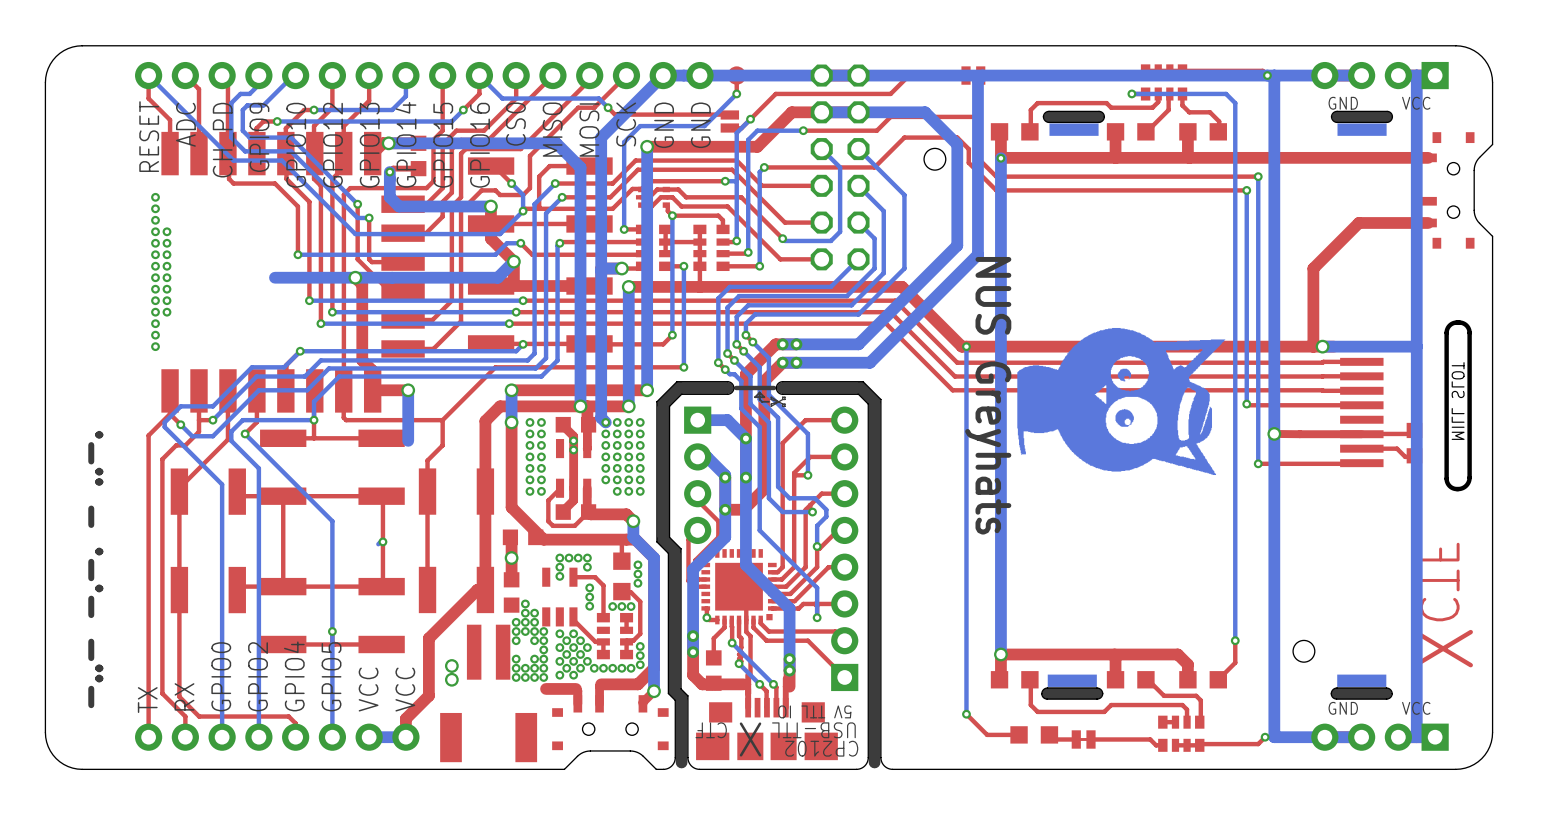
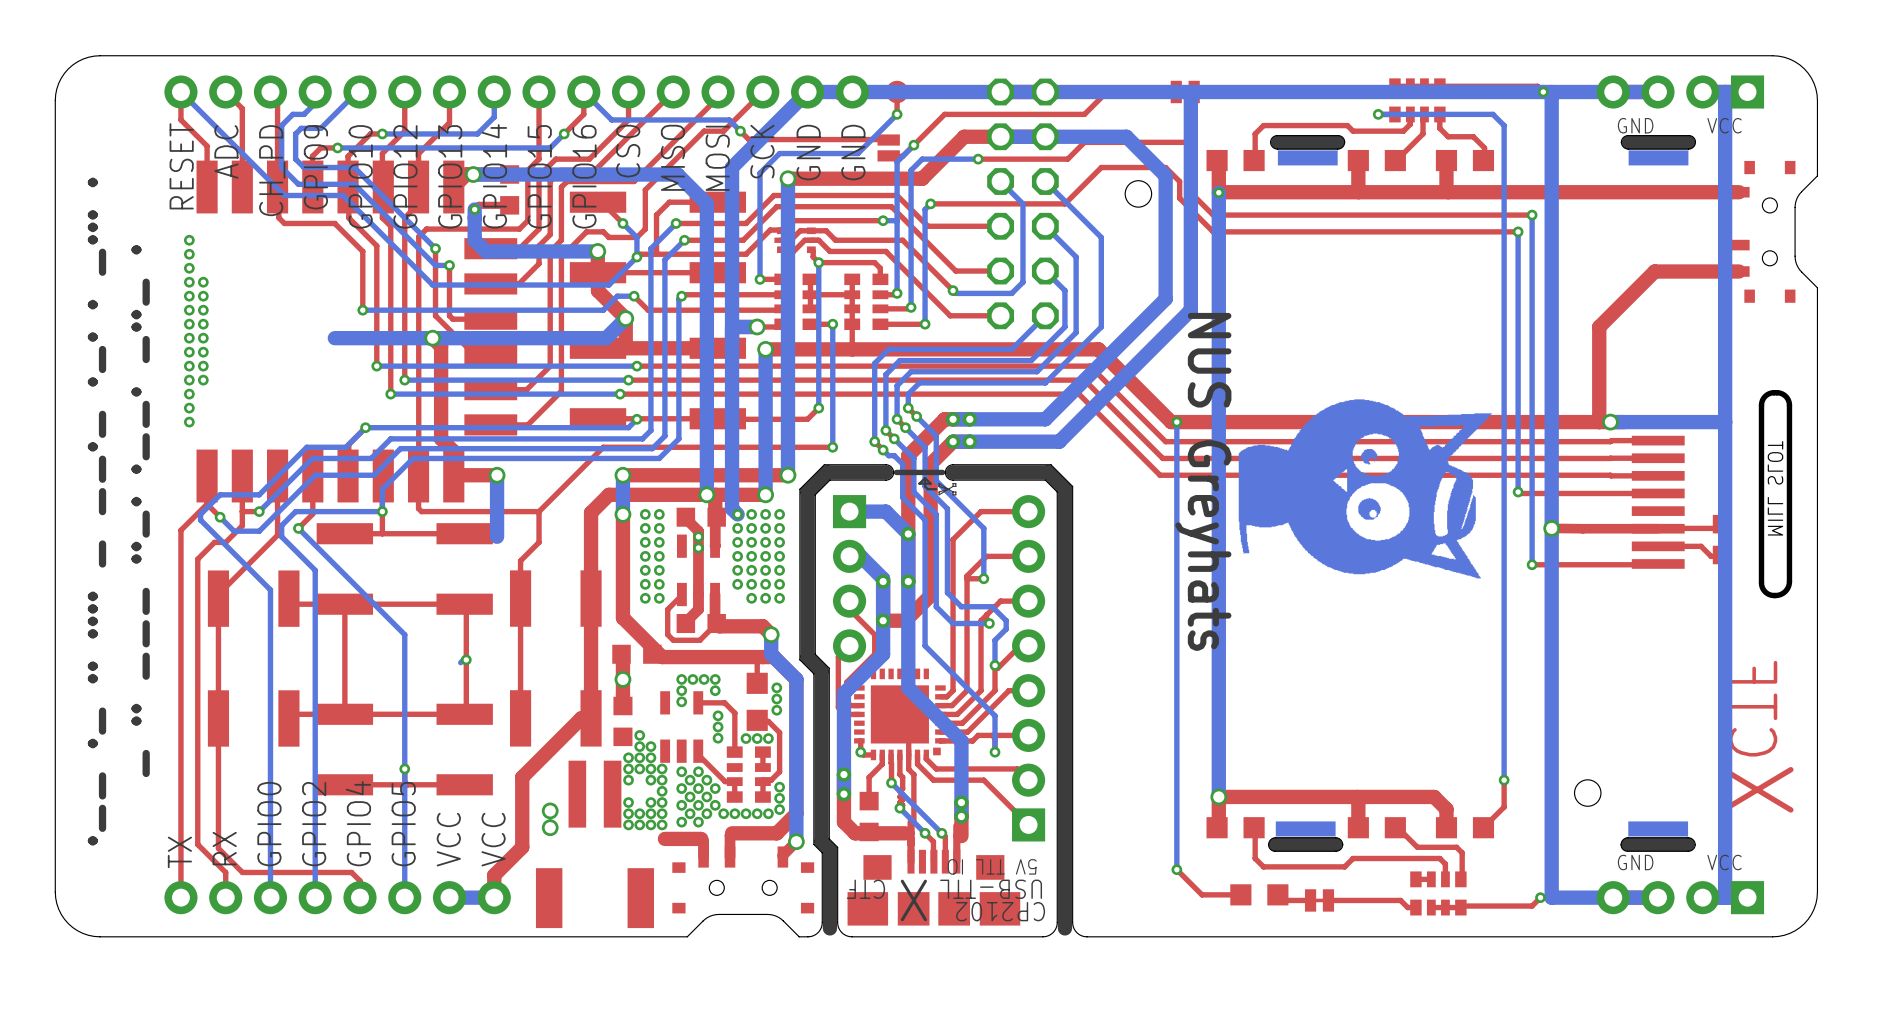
text: none -> . ...- . .-. -.-- - .... .. -. --. (96, 511)
text: -..- -.-. - ..-. (95, 569) -> . -..- .--. .-.. --- .. - (140, 510)

